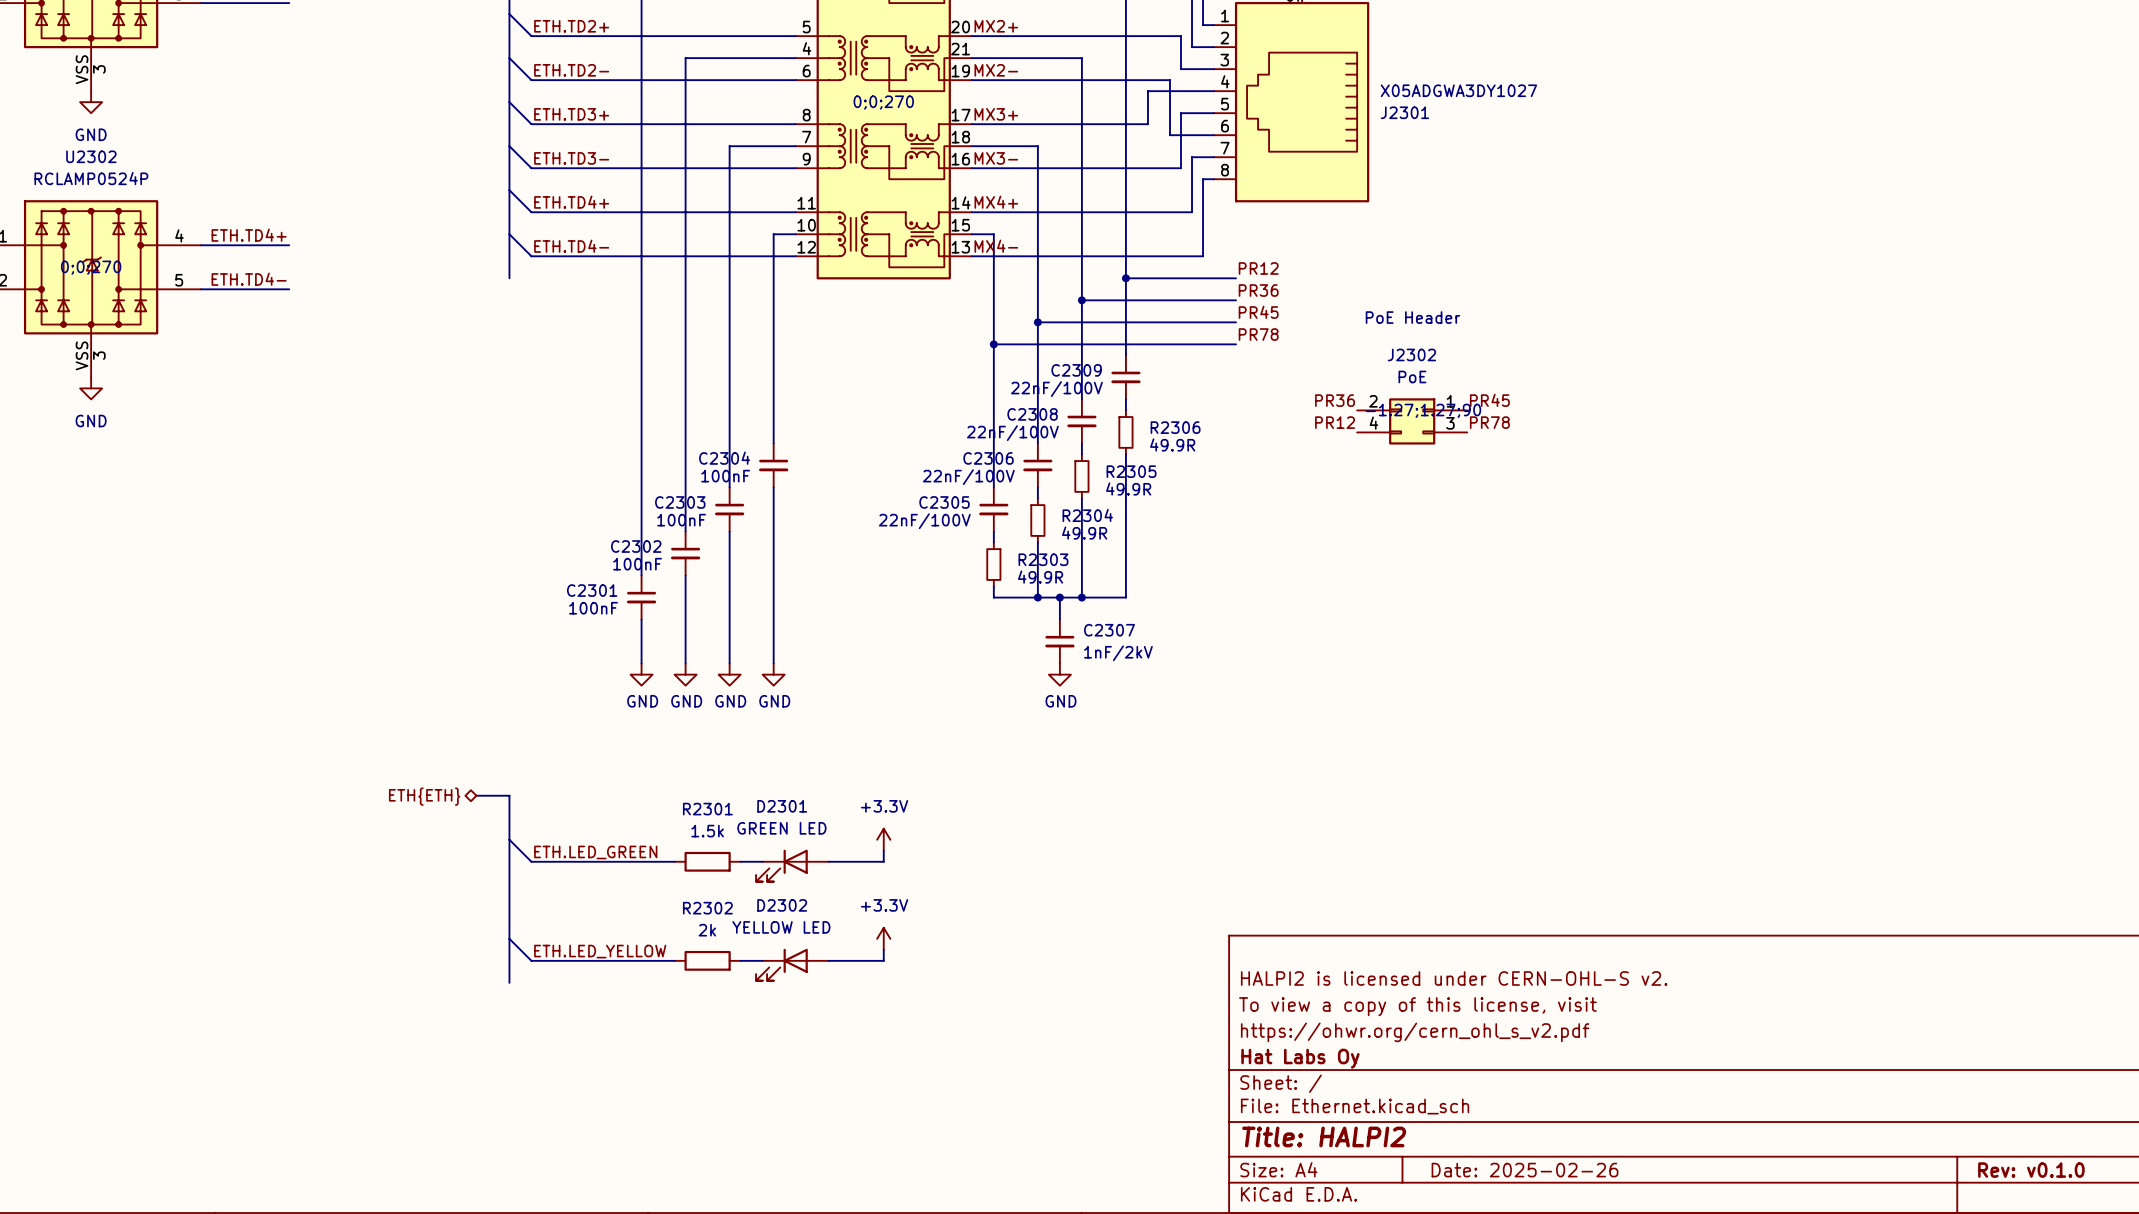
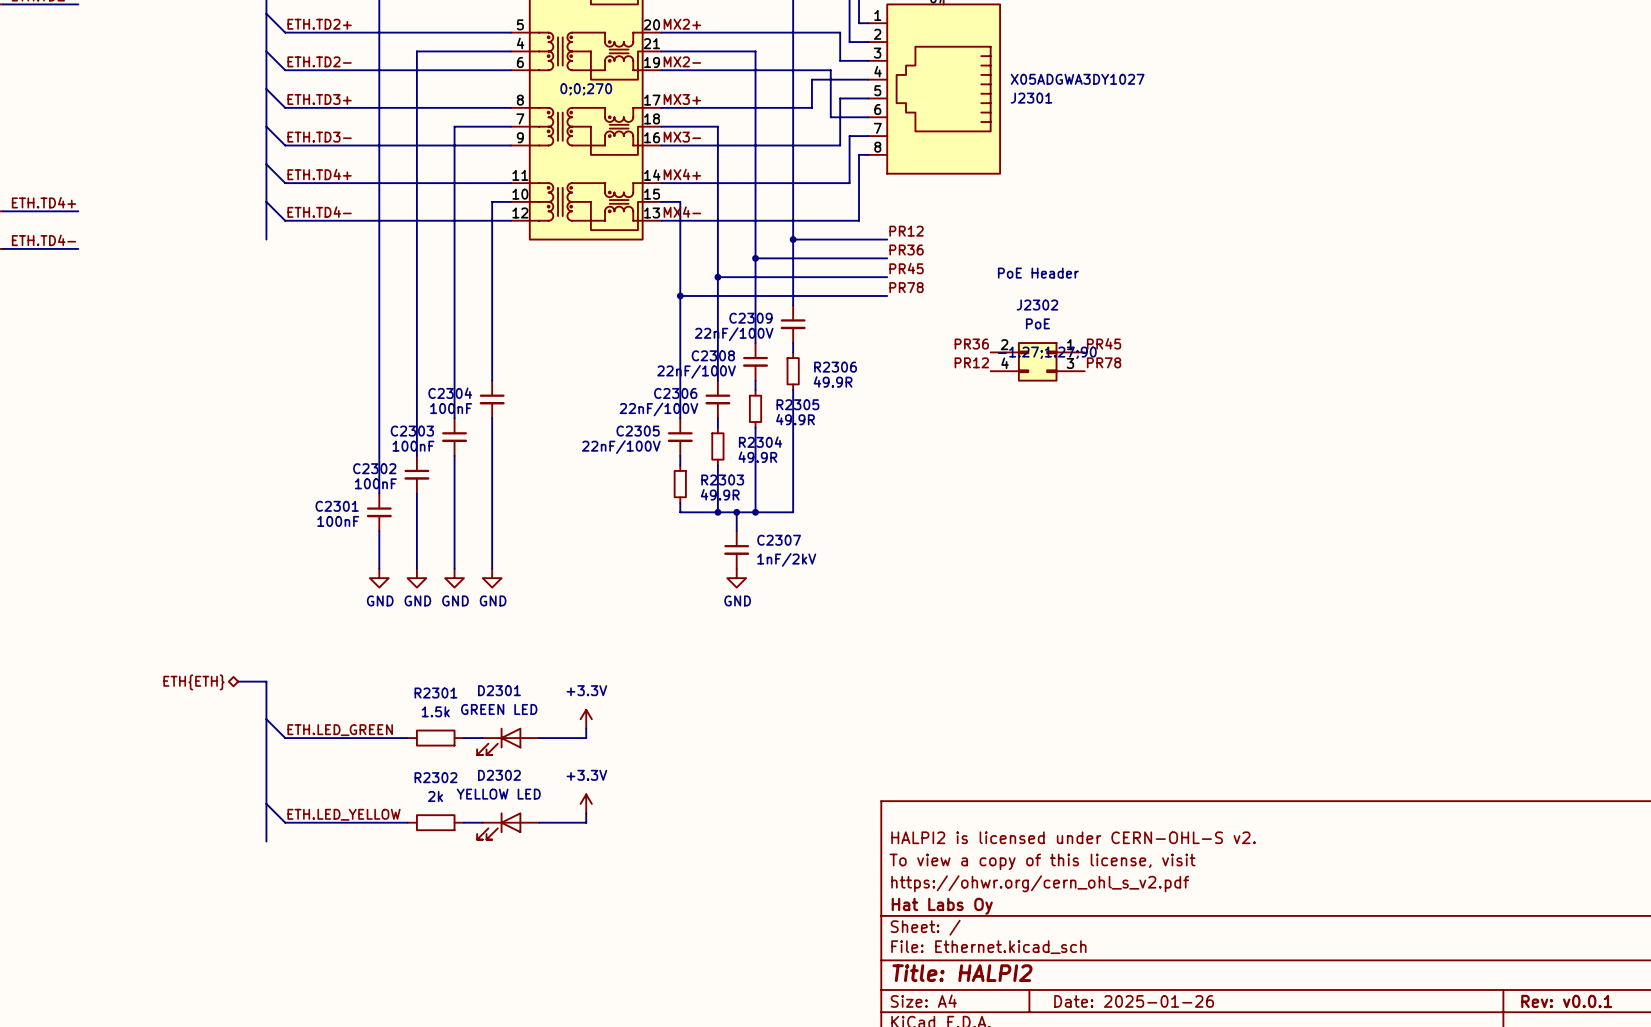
title block: Date: 2025-02-26 (1525, 1170) -> Date: 2025-01-26 (1134, 1001)
title block: Rev: v0.1.0 (2031, 1170) -> Rev: v0.0.1 (1566, 1001)

